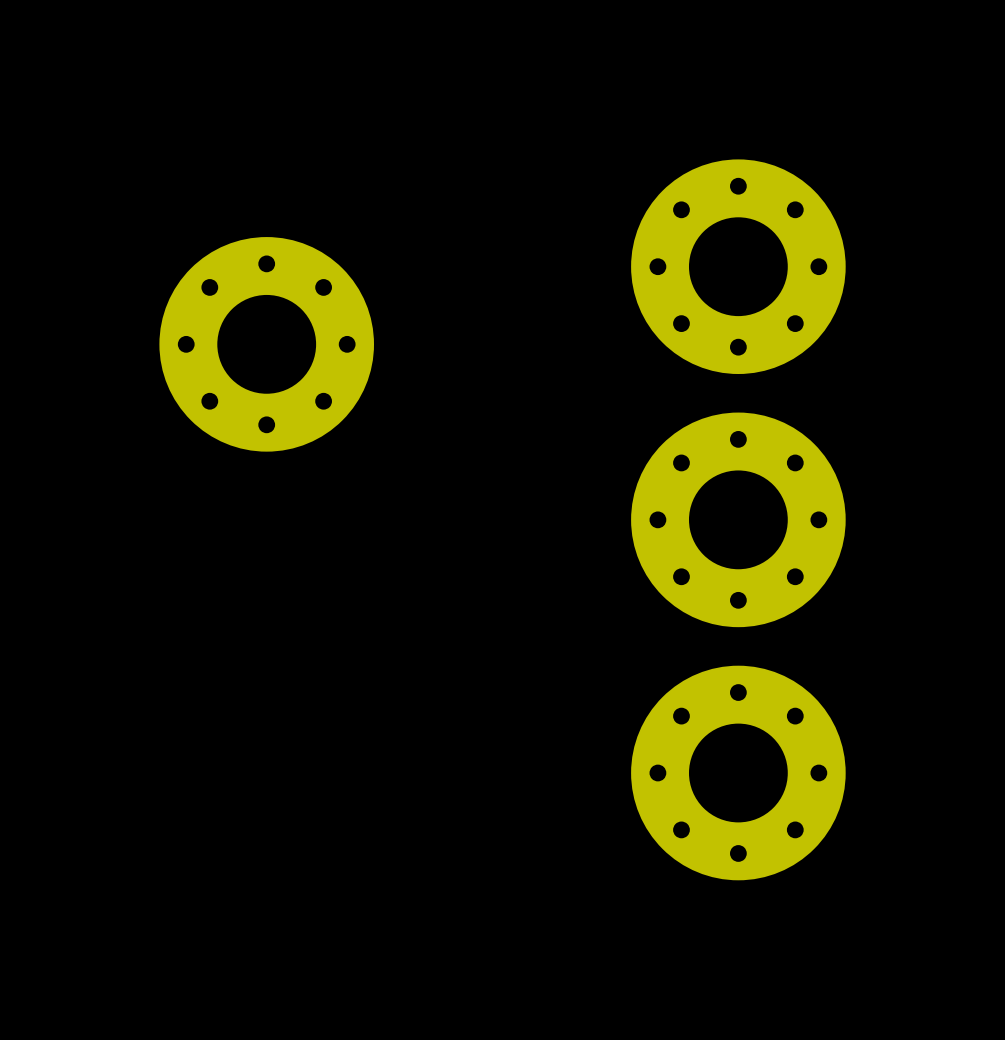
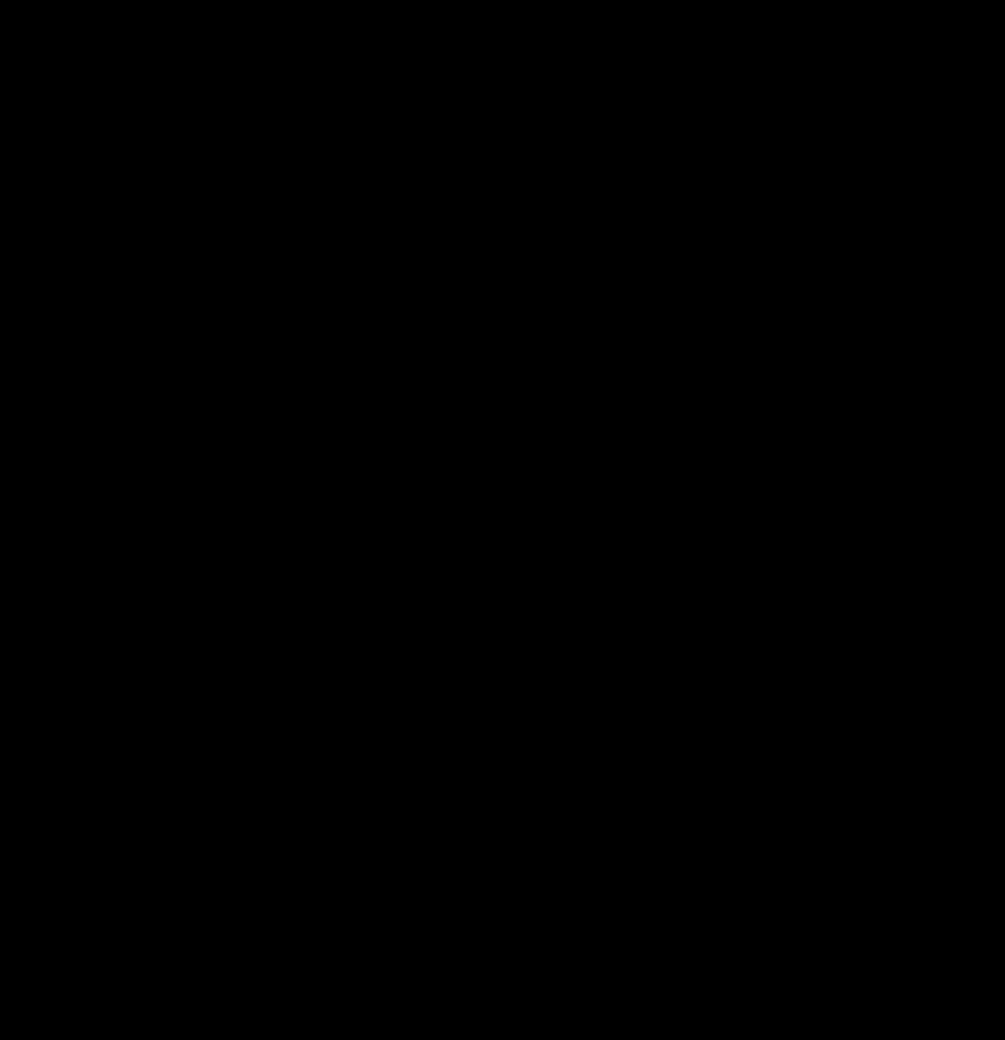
part: (738, 266) -> none
part: (266, 344) -> none
part: (738, 519) -> none
part: (738, 773) -> none

